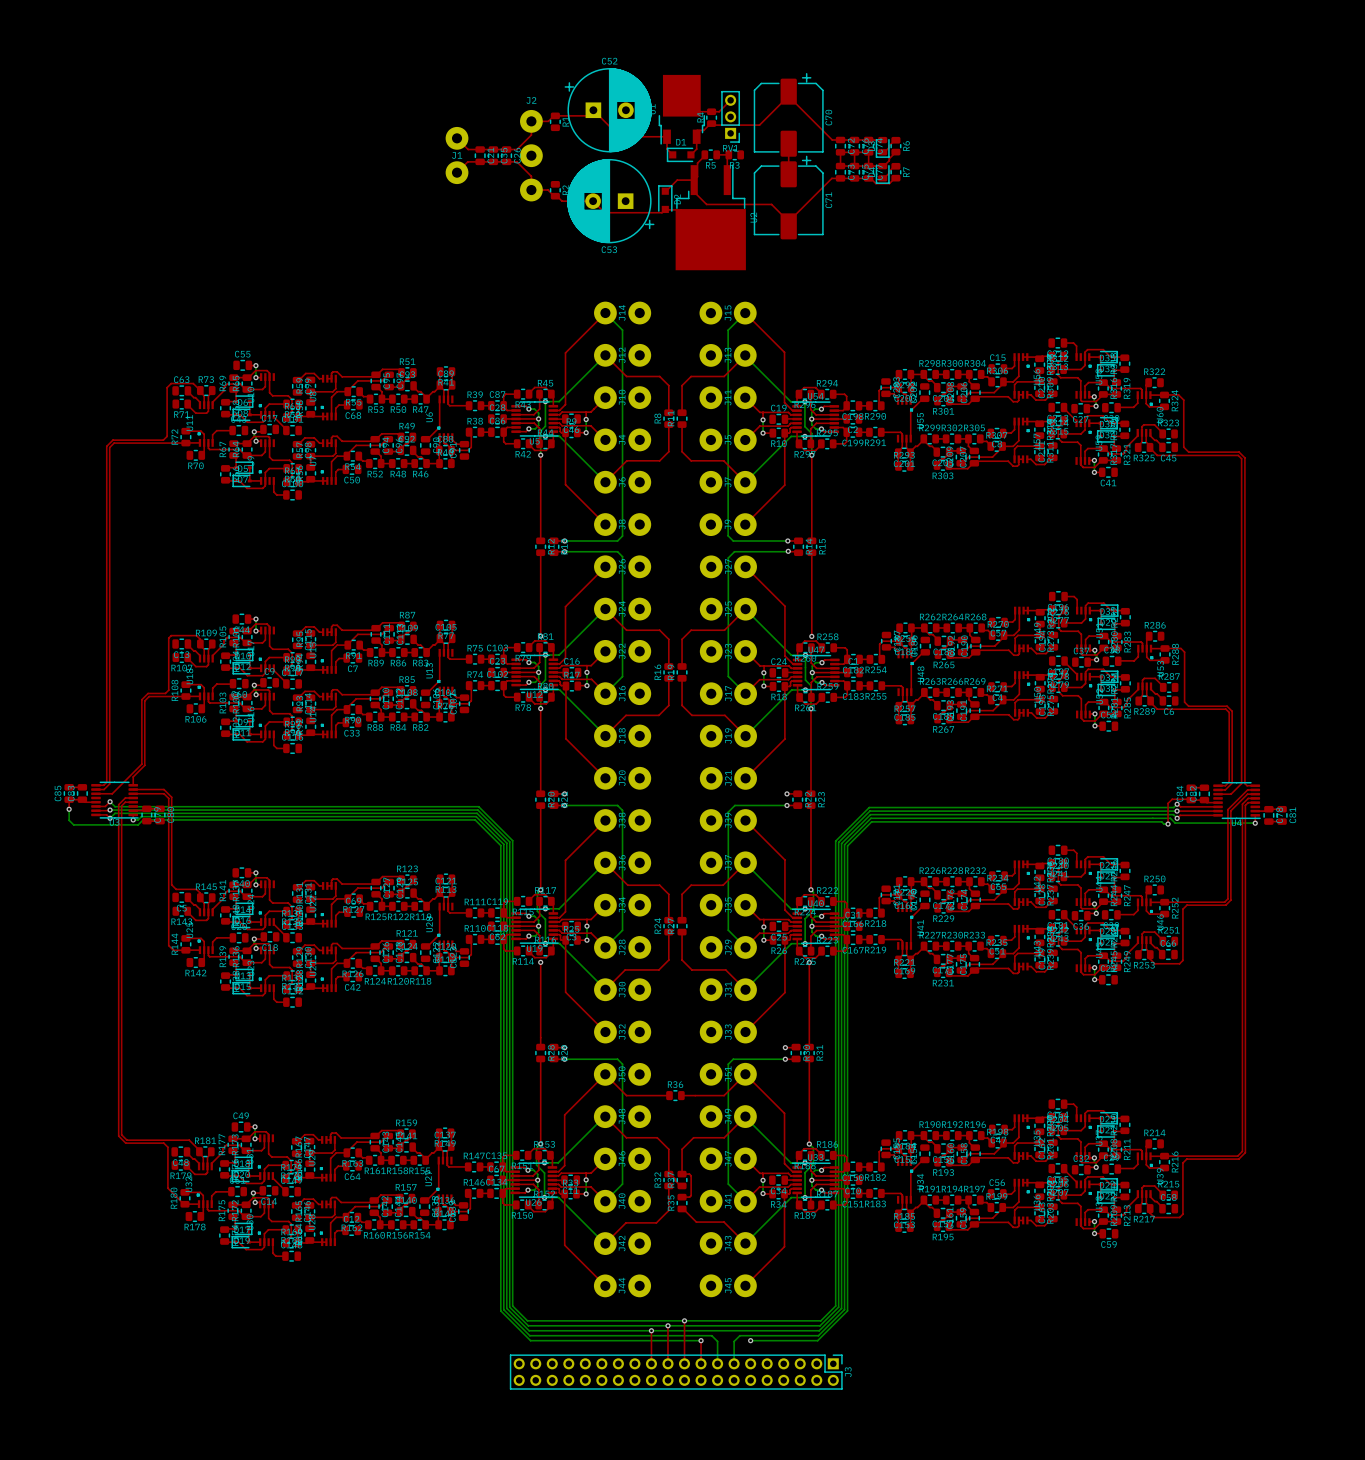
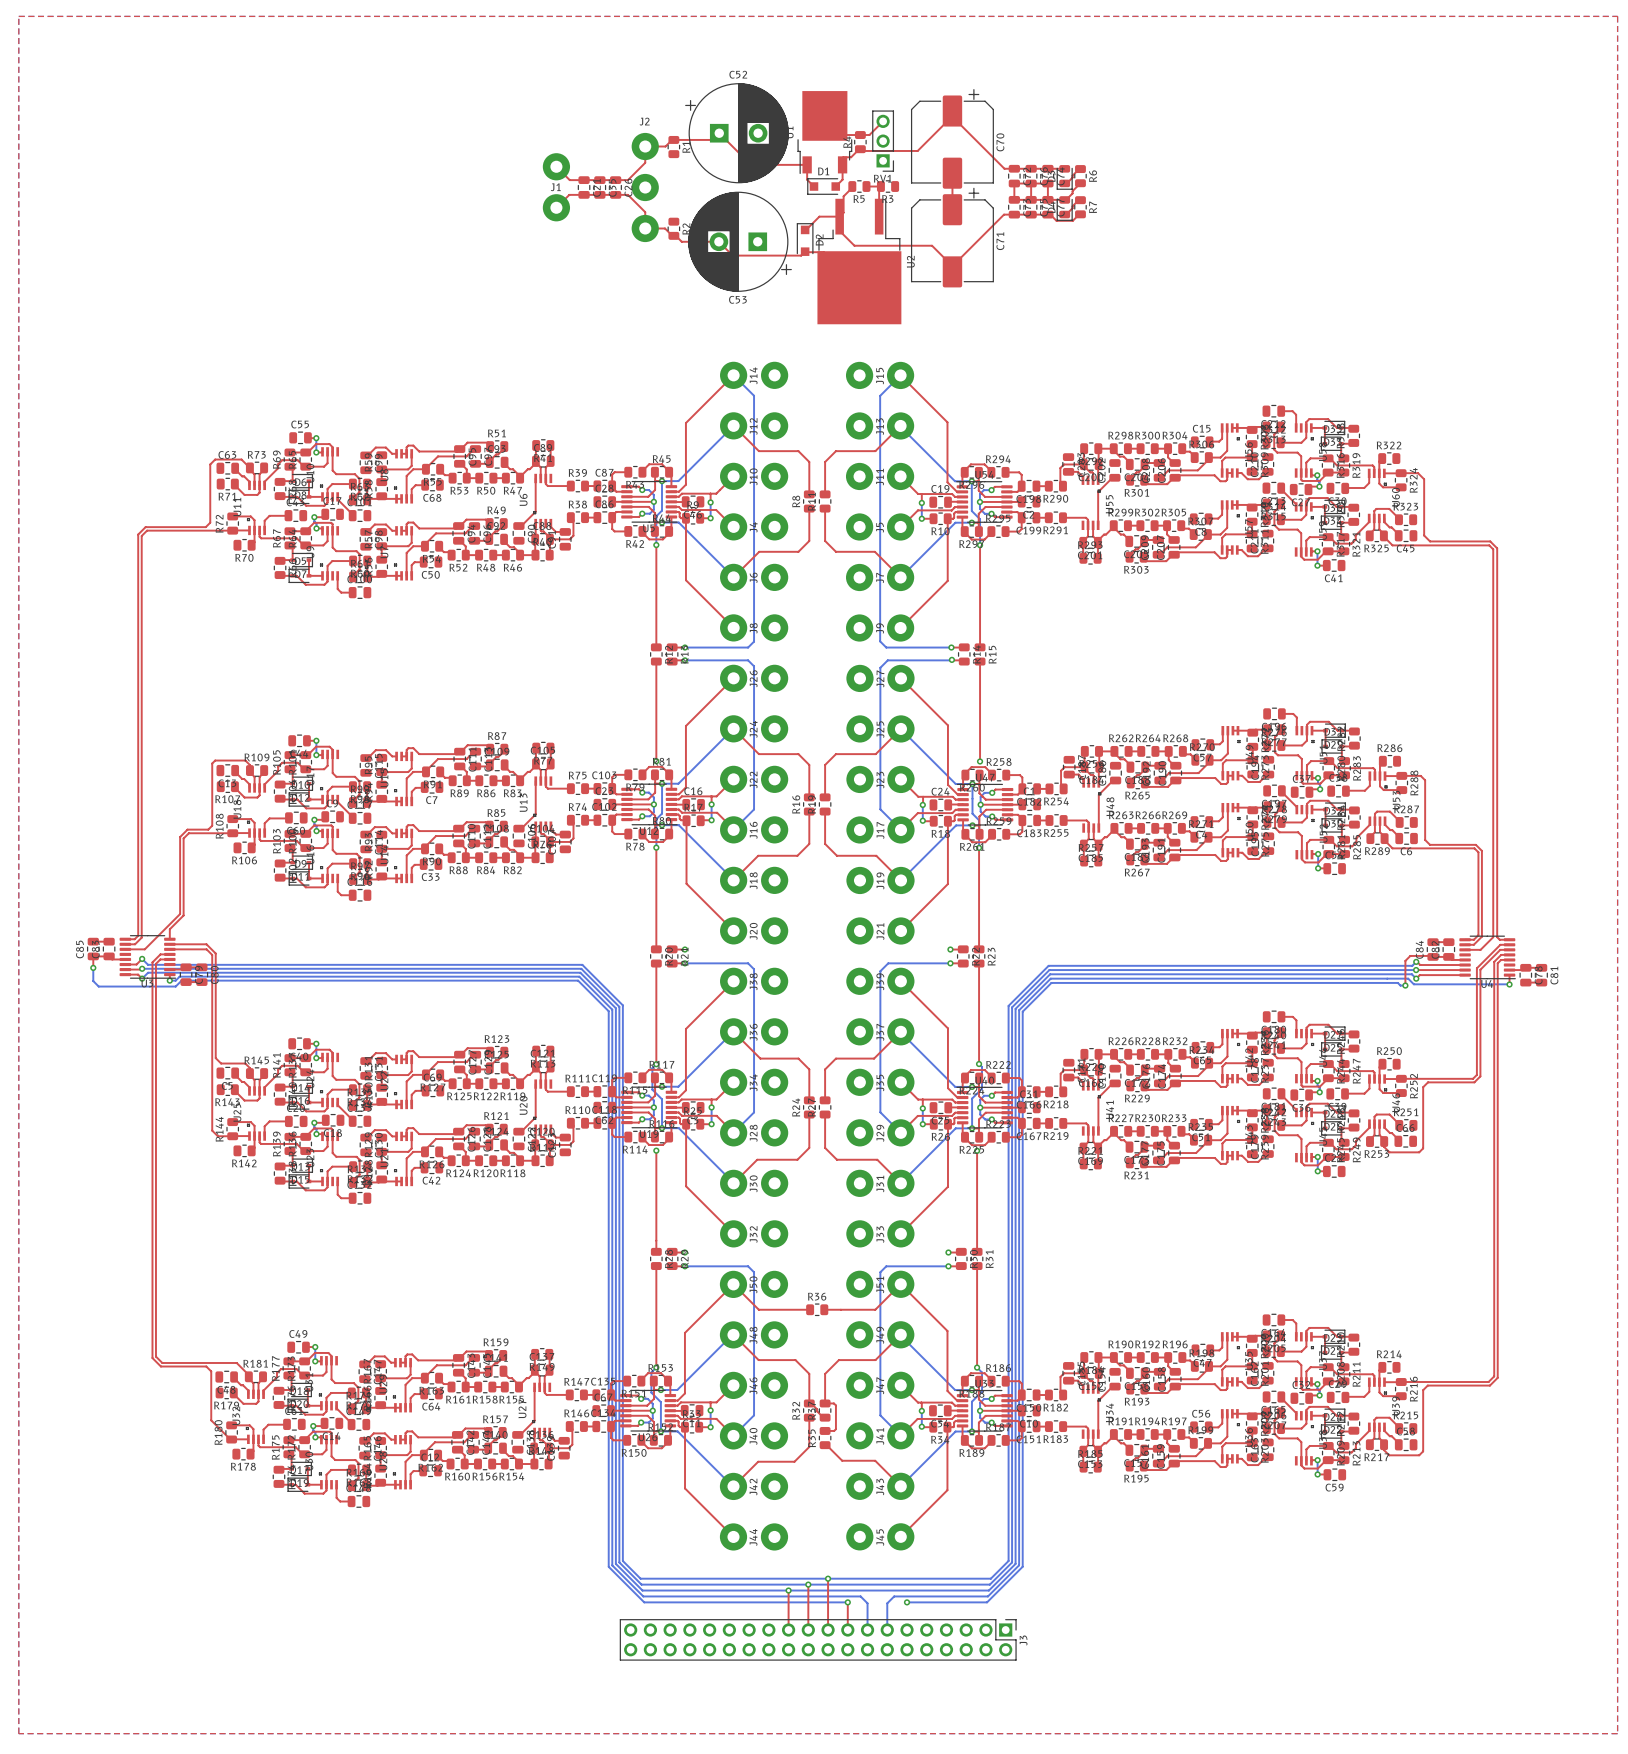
top zone outline: none -> (18, 16) (18, 1733) (1617, 1733) (1617, 16) (18, 16)

